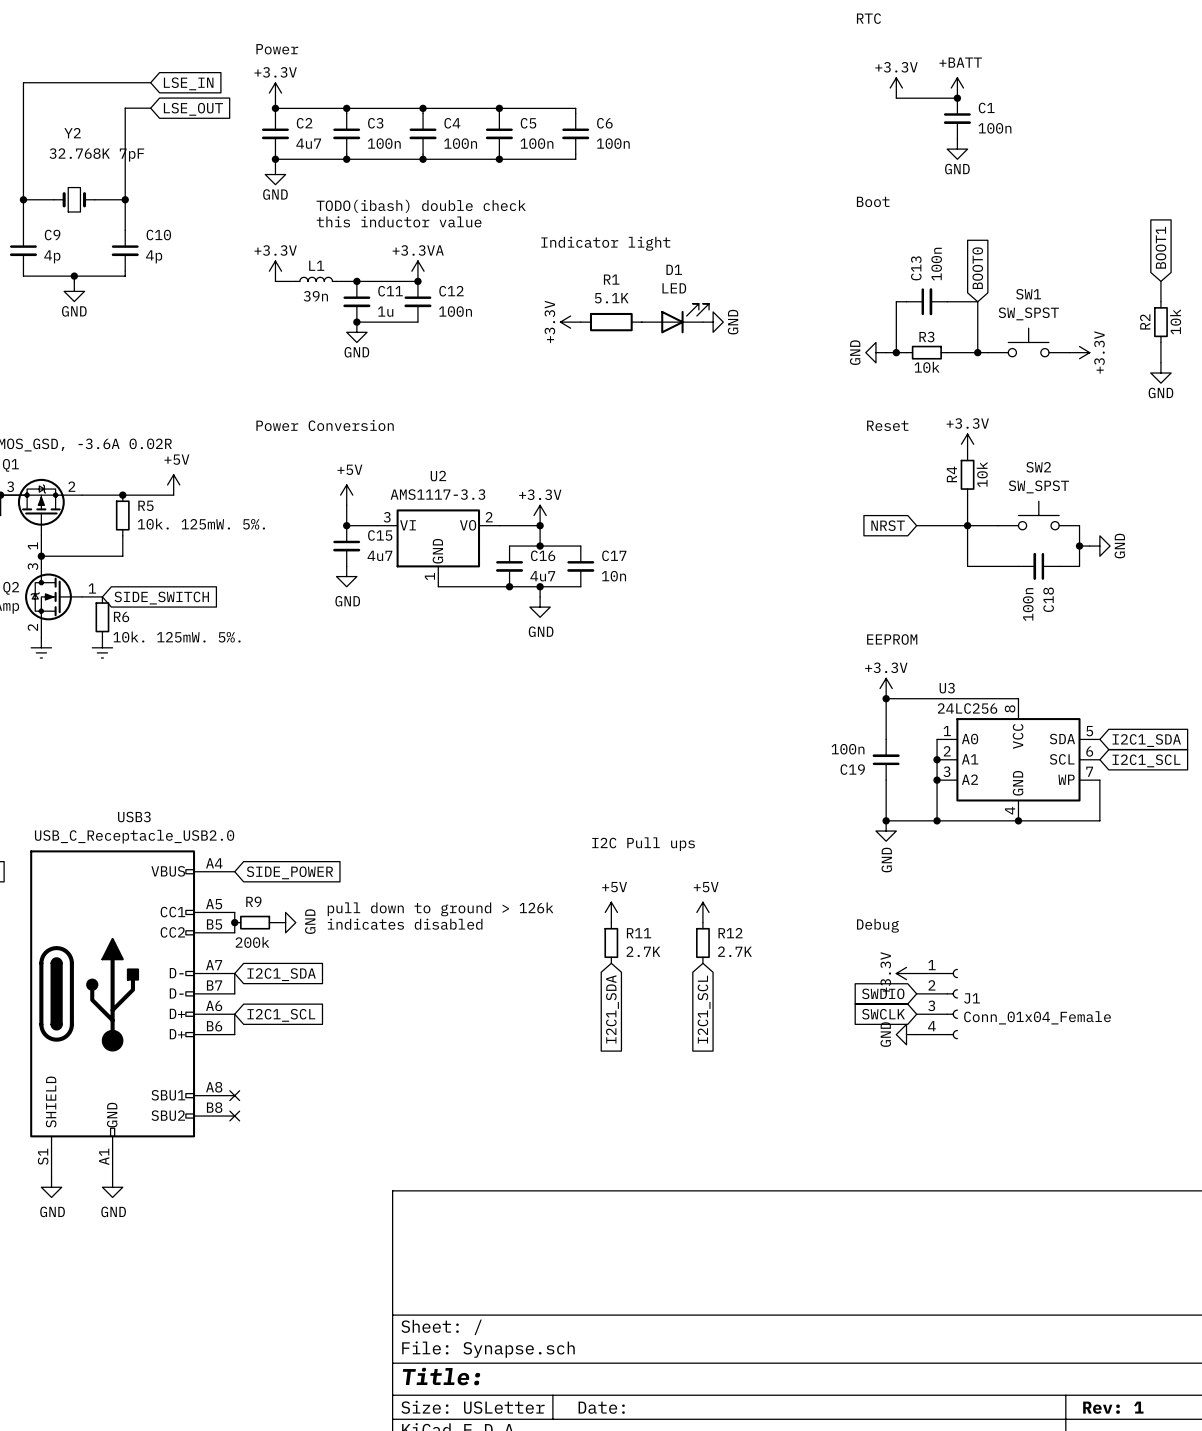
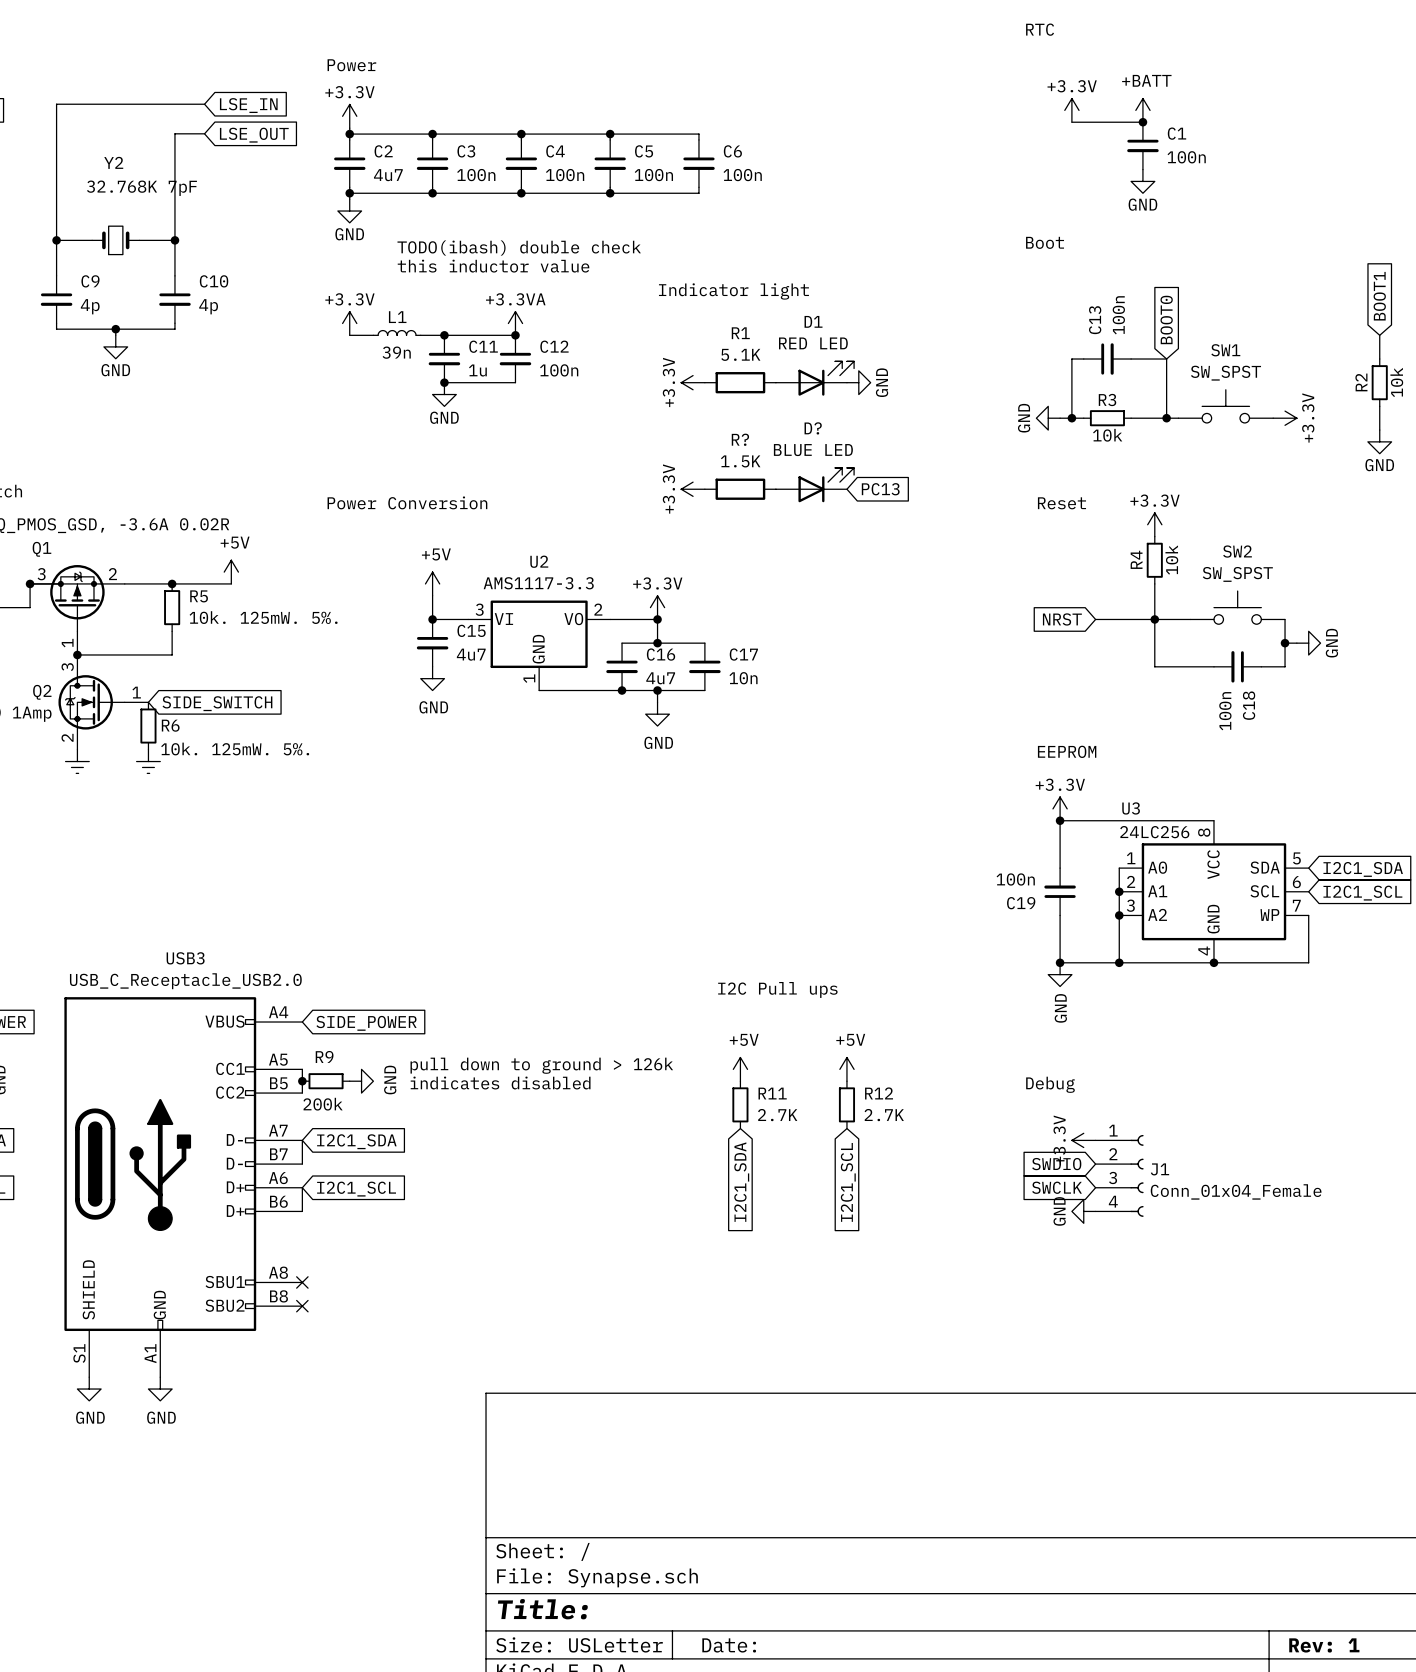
D1 value: LED (674, 288) -> RED LED (813, 343)
D?: none -> BLUE LED (815, 485)
power symbol: none -> +3.3V (693, 489)
R?: none -> 1.5K (740, 489)
global label: none -> PC13 (880, 489)

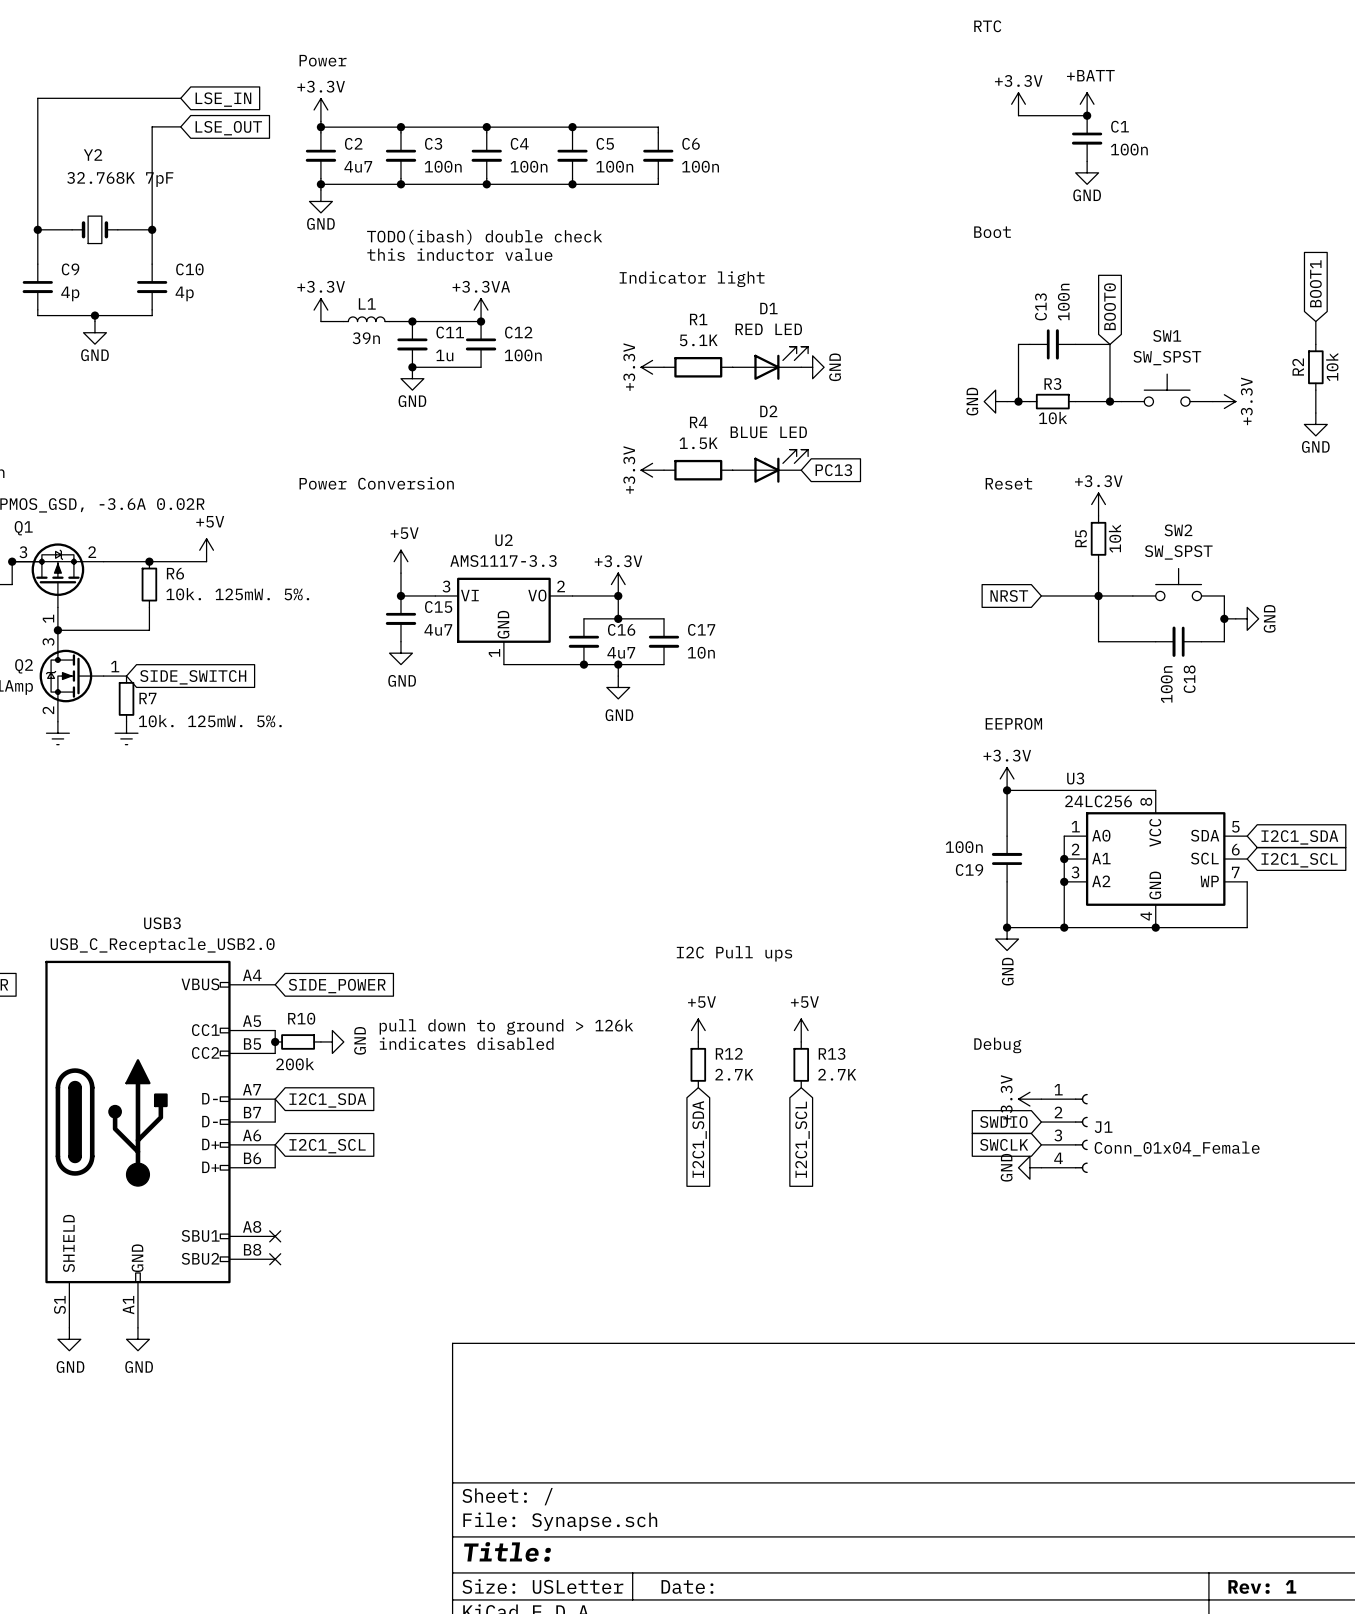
D? name: D? (813, 428) -> D2 (768, 411)
R? name: R? (740, 439) -> R4 (698, 422)
R4 name: R4 (1136, 559) -> R5 (1081, 538)
R5 name: R5 (199, 596) -> R6 (175, 573)
R6 name: R6 (170, 725) -> R7 (147, 698)
R9 name: R9 (324, 1056) -> R10 (301, 1018)
R11 name: R11 (772, 1093) -> R12 (729, 1053)
R12 name: R12 (879, 1093) -> R13 (832, 1053)

